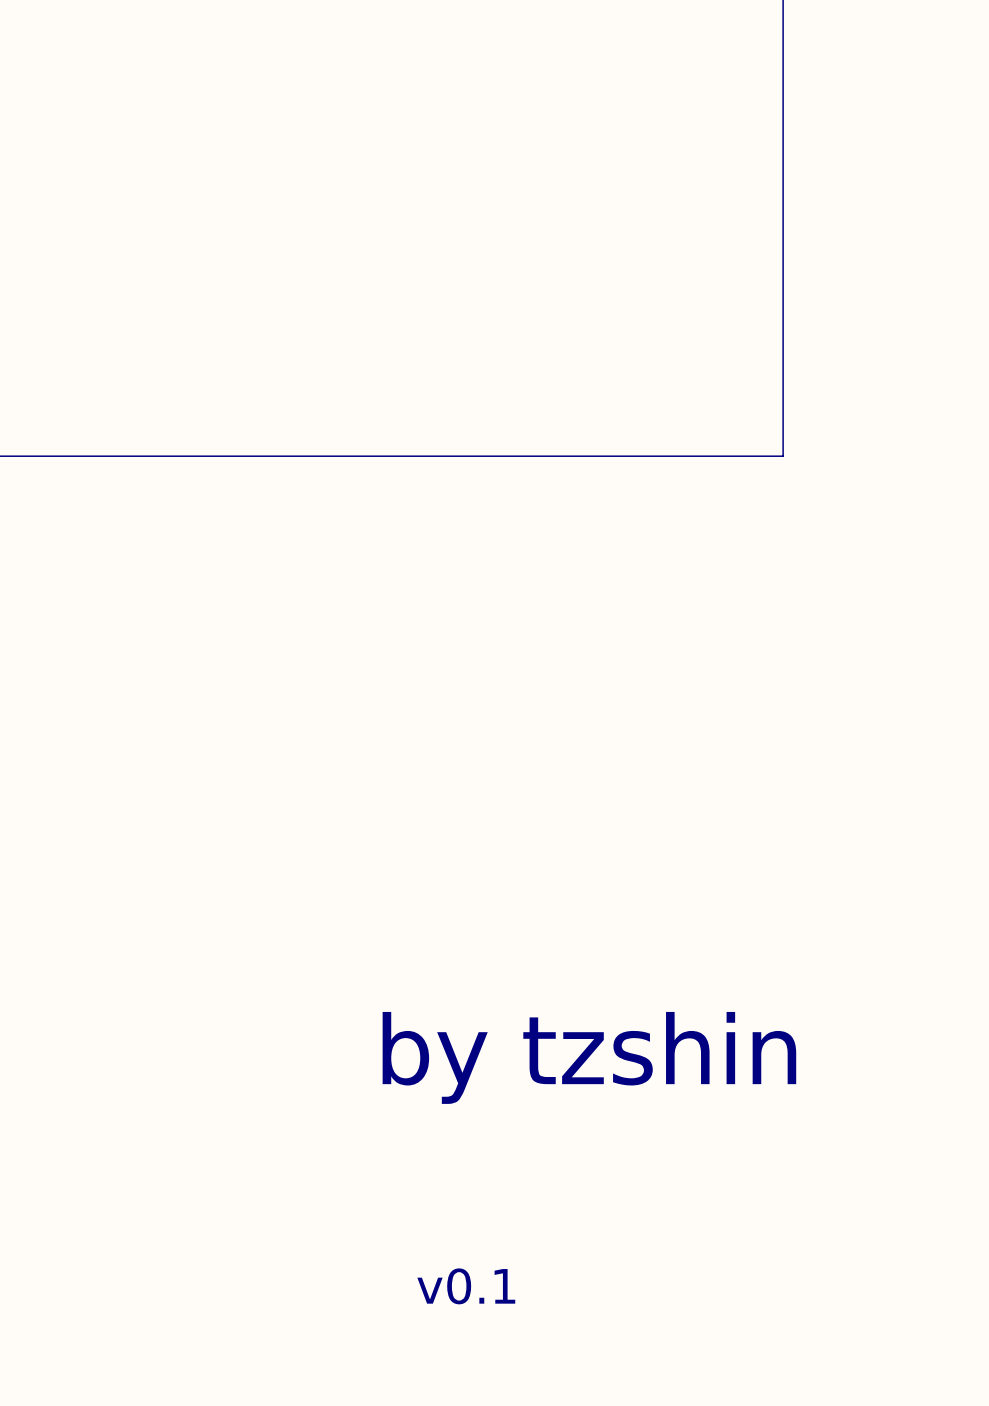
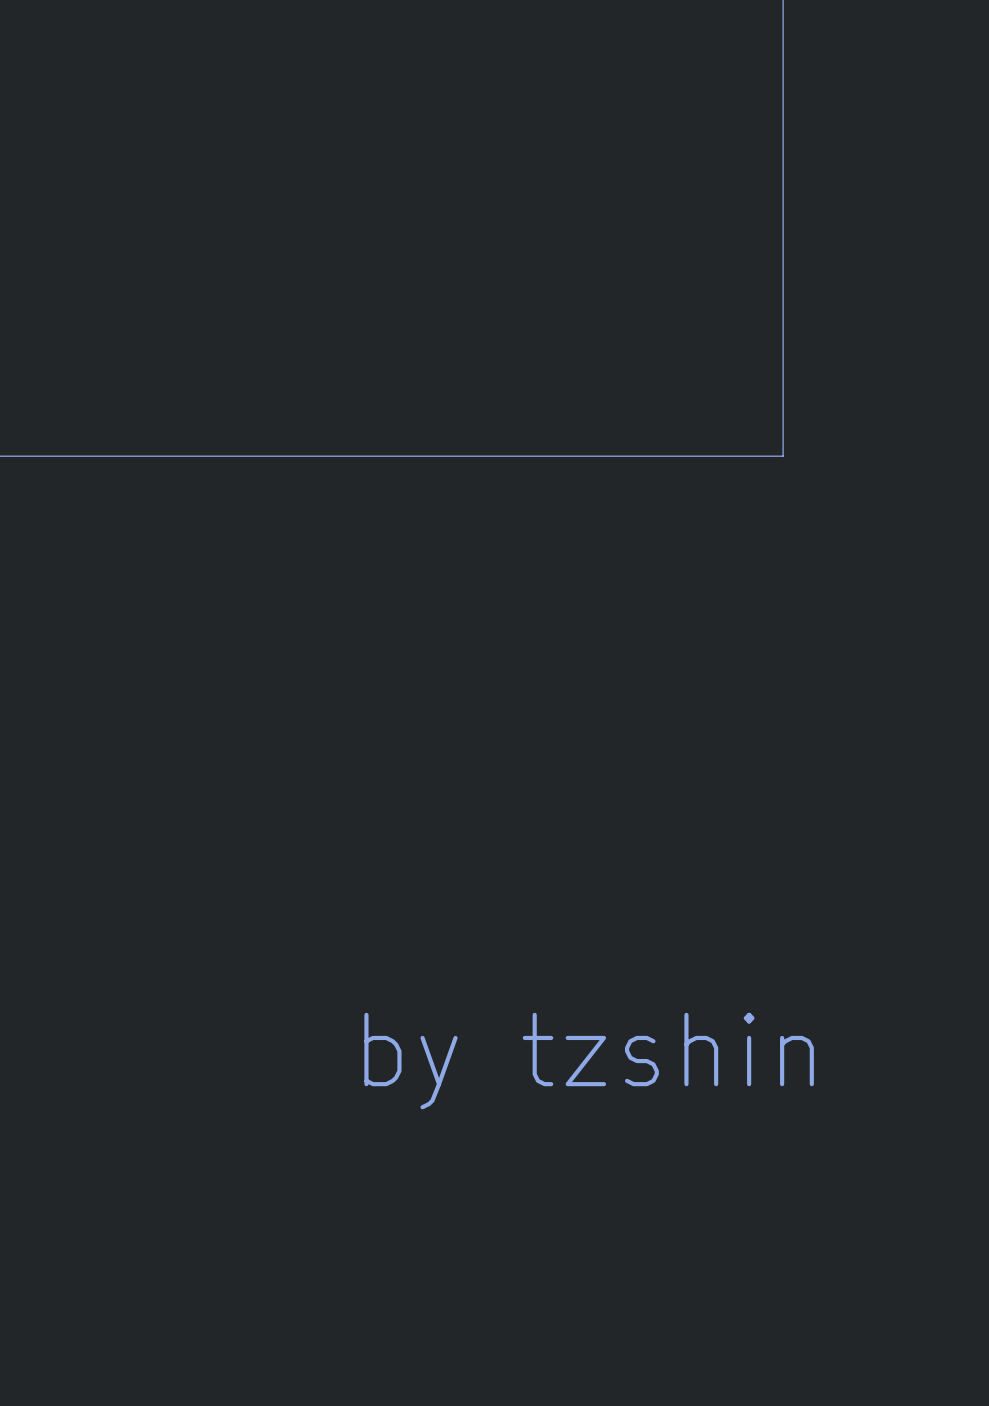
text: v0.1 (466, 1286) -> none

